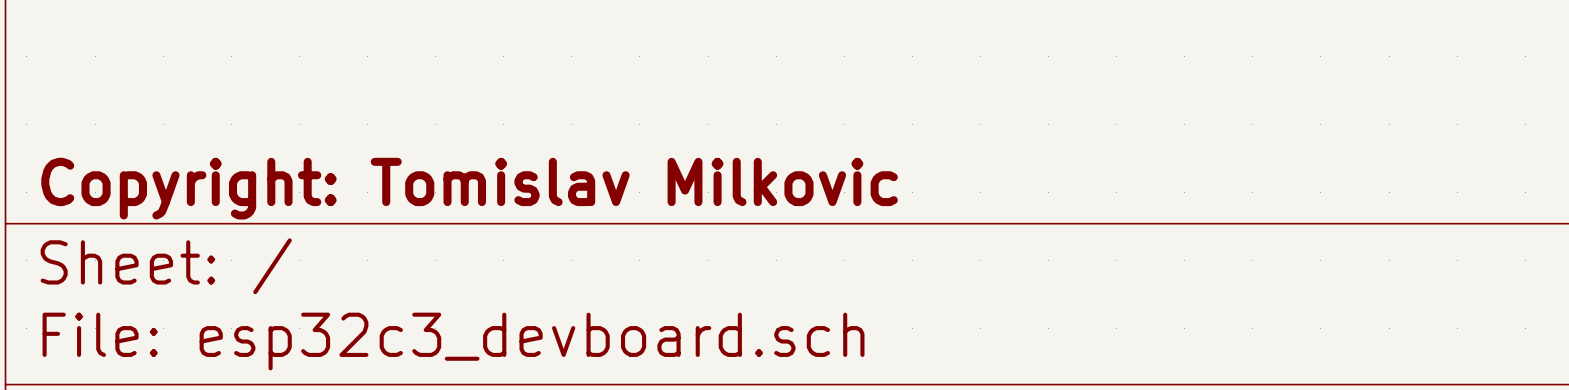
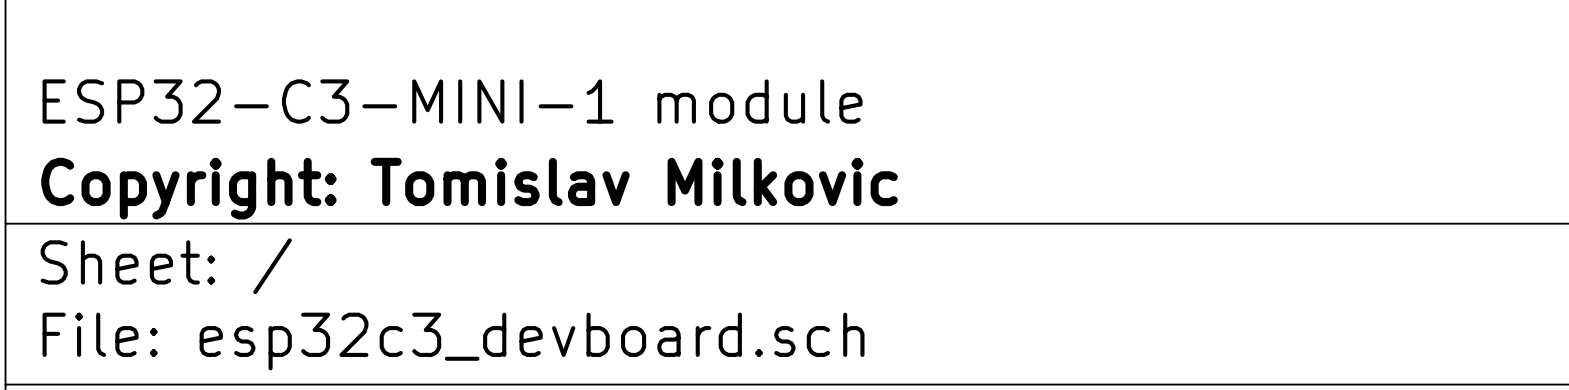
title block: none -> ESP32-C3-MINI-1 module (452, 101)

